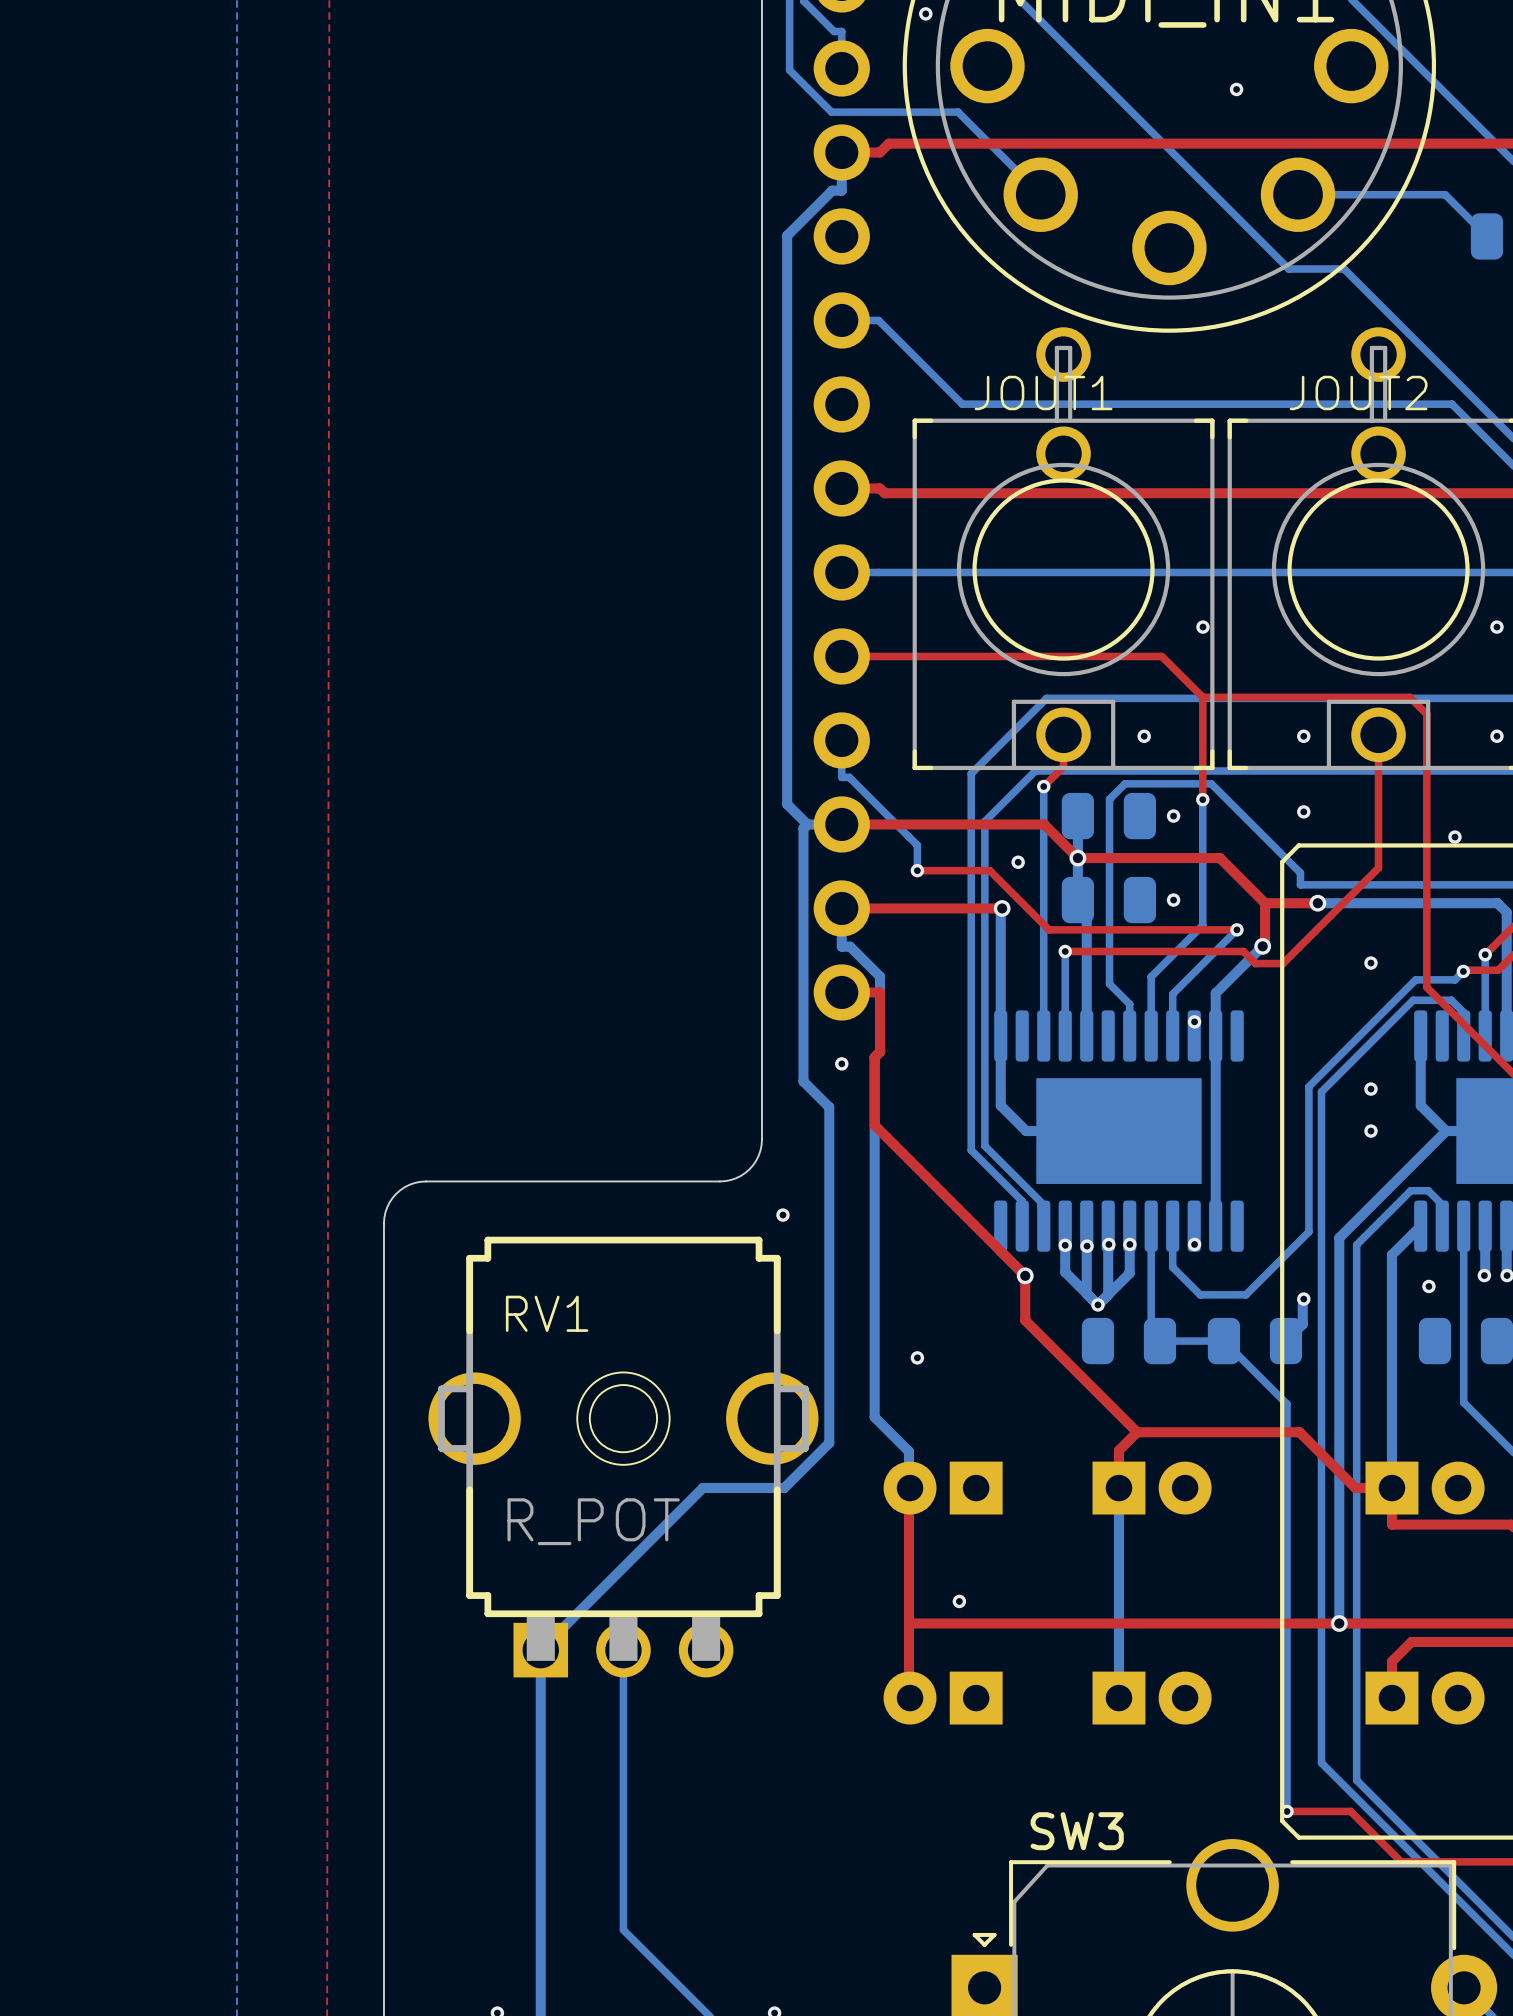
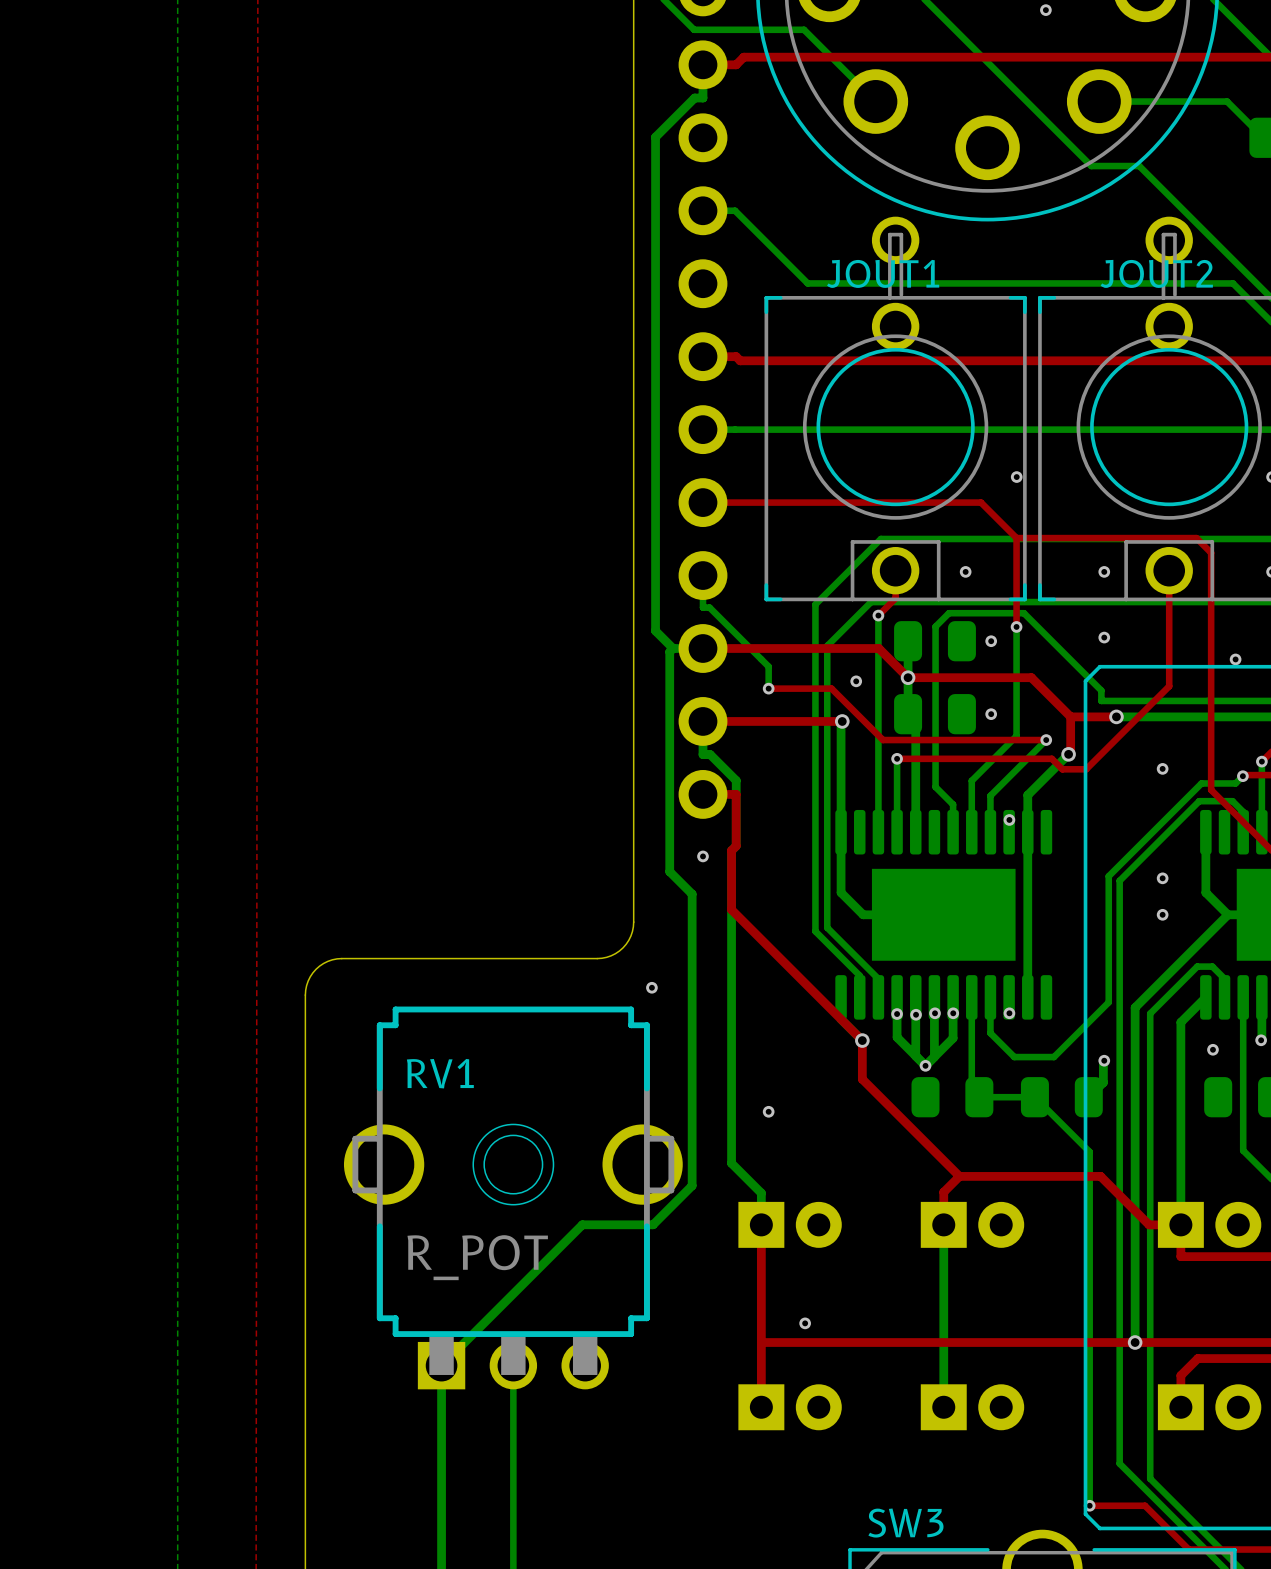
part rotation: 0° (943, 1488) -> 180° (790, 1224)
part rotation: 0° (943, 1698) -> 180° (790, 1407)

